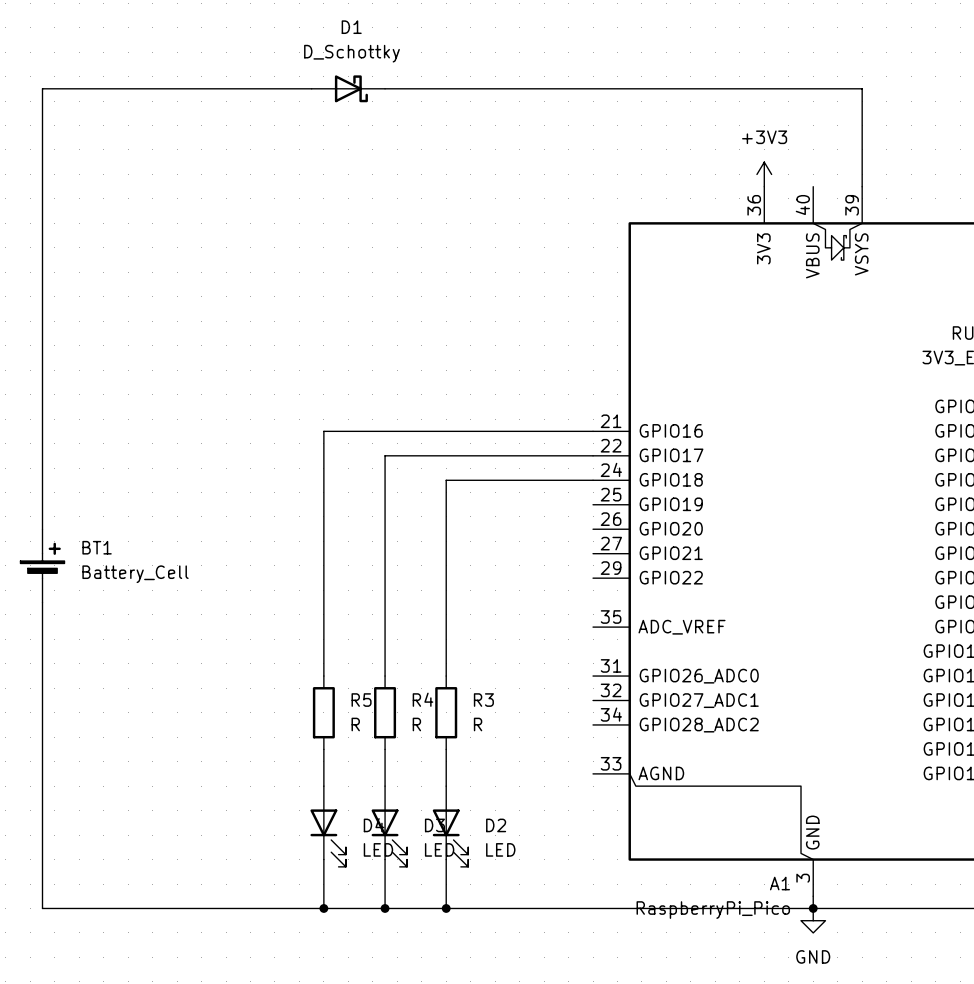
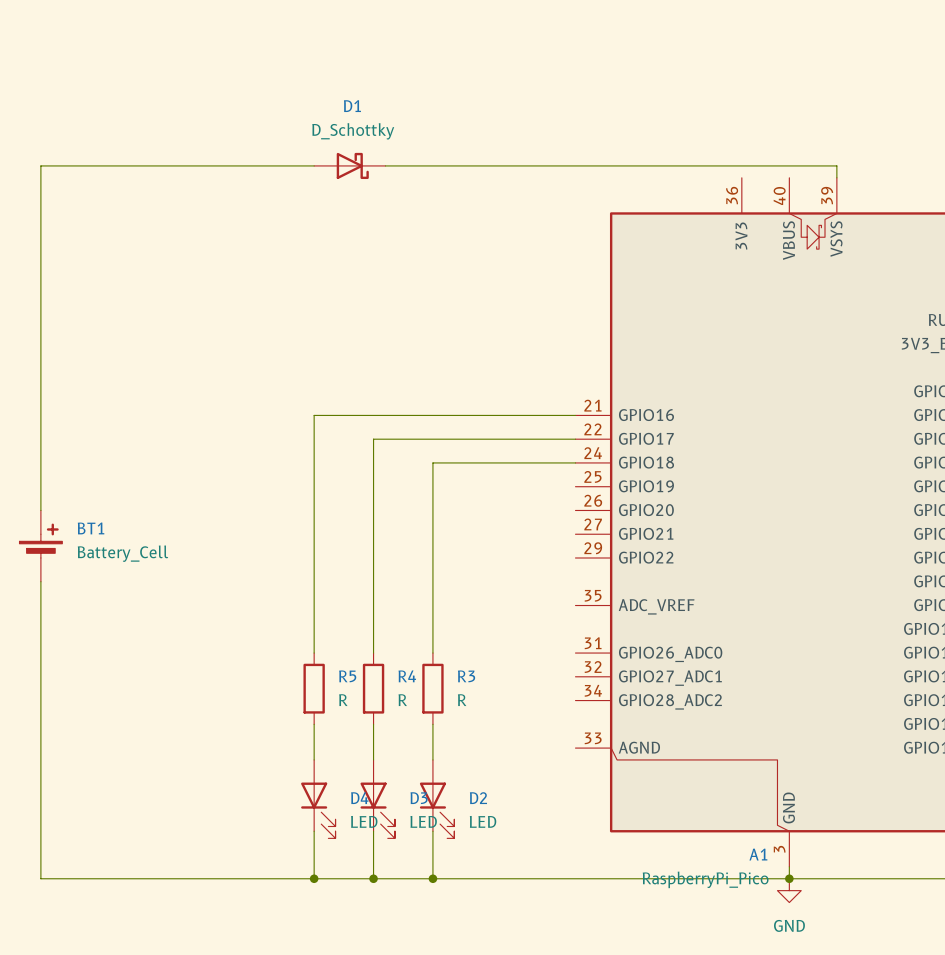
wire: (311, 88) (42, 88) (42, 174) -> (314, 165) (40, 165)
D1 position: (348, 88) -> (349, 165)
wire: (385, 88) (862, 88) (862, 174) -> (385, 165) (836, 165)
power symbol: +3V3 (764, 174) -> none

